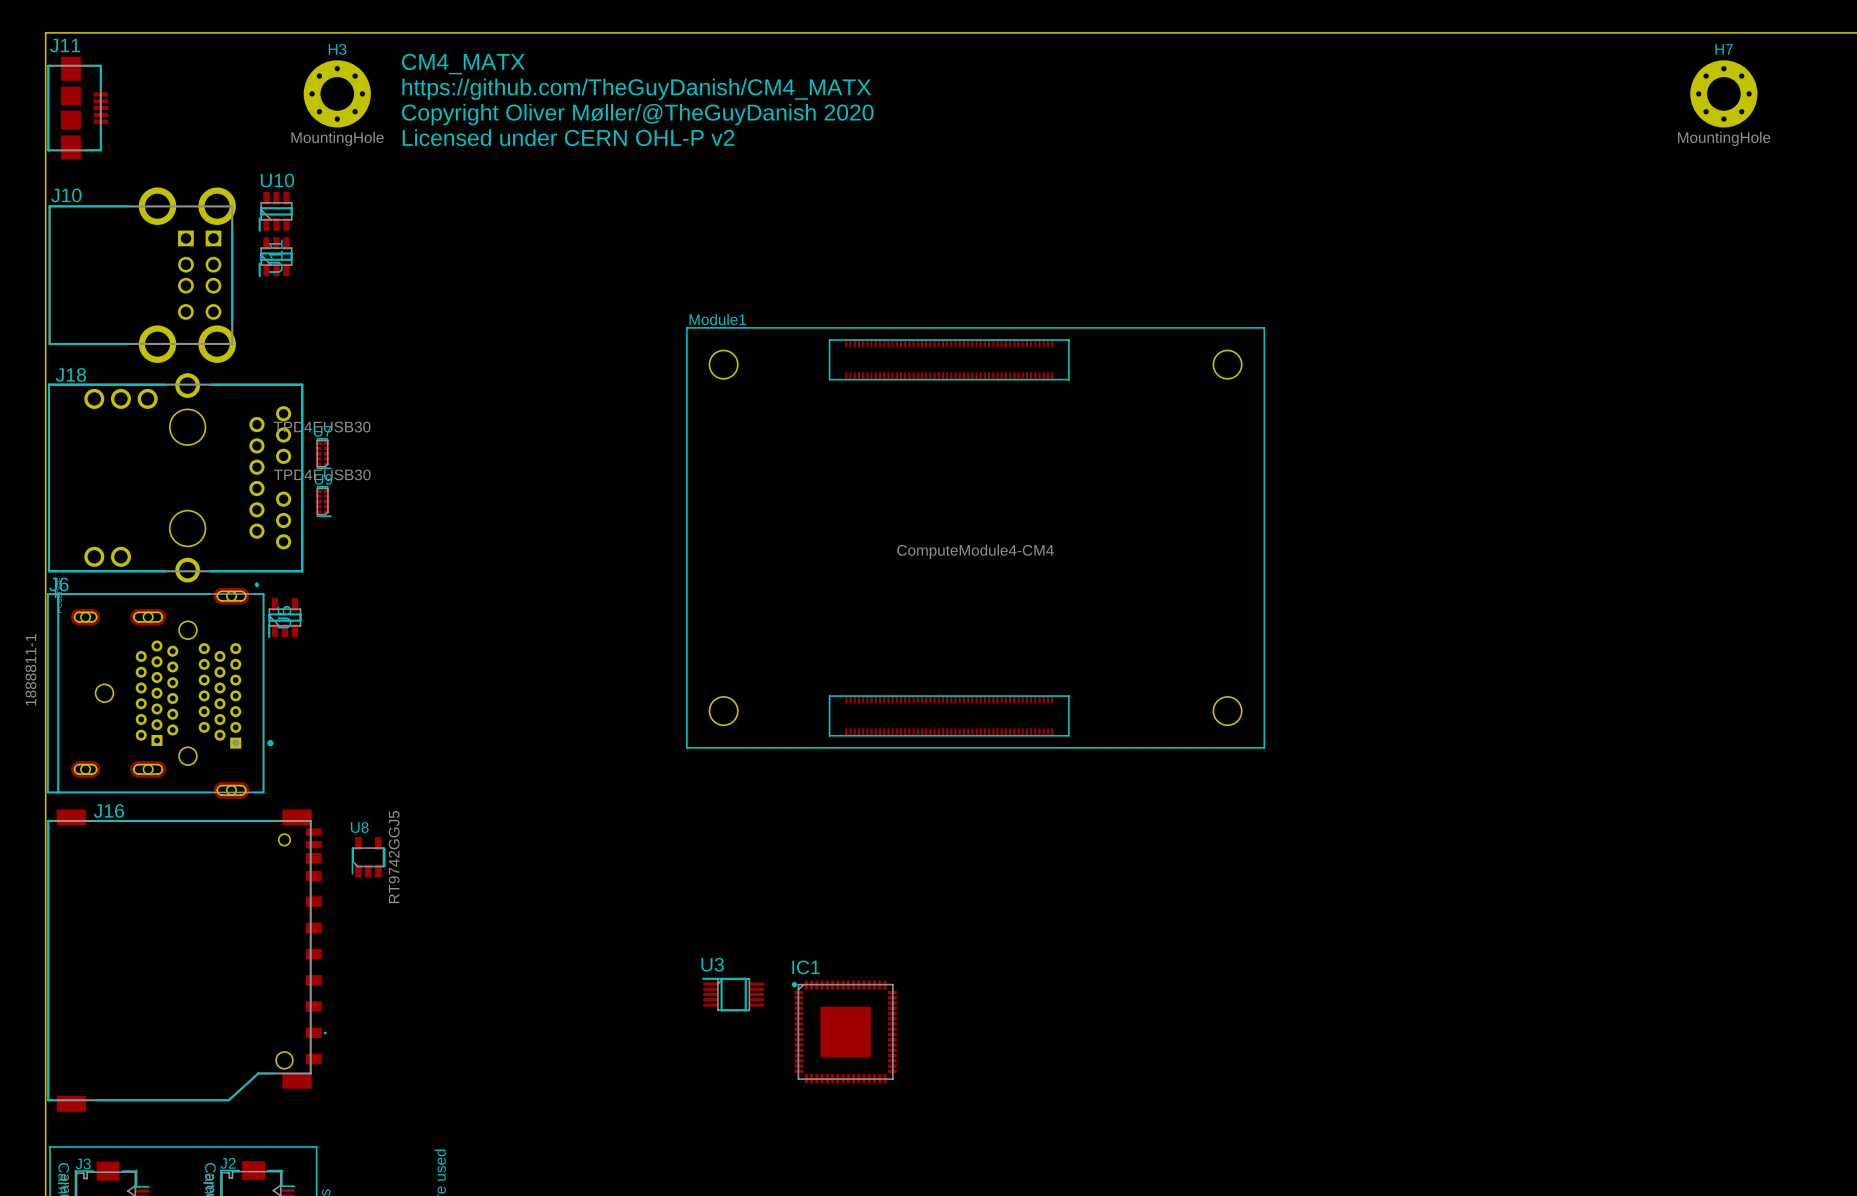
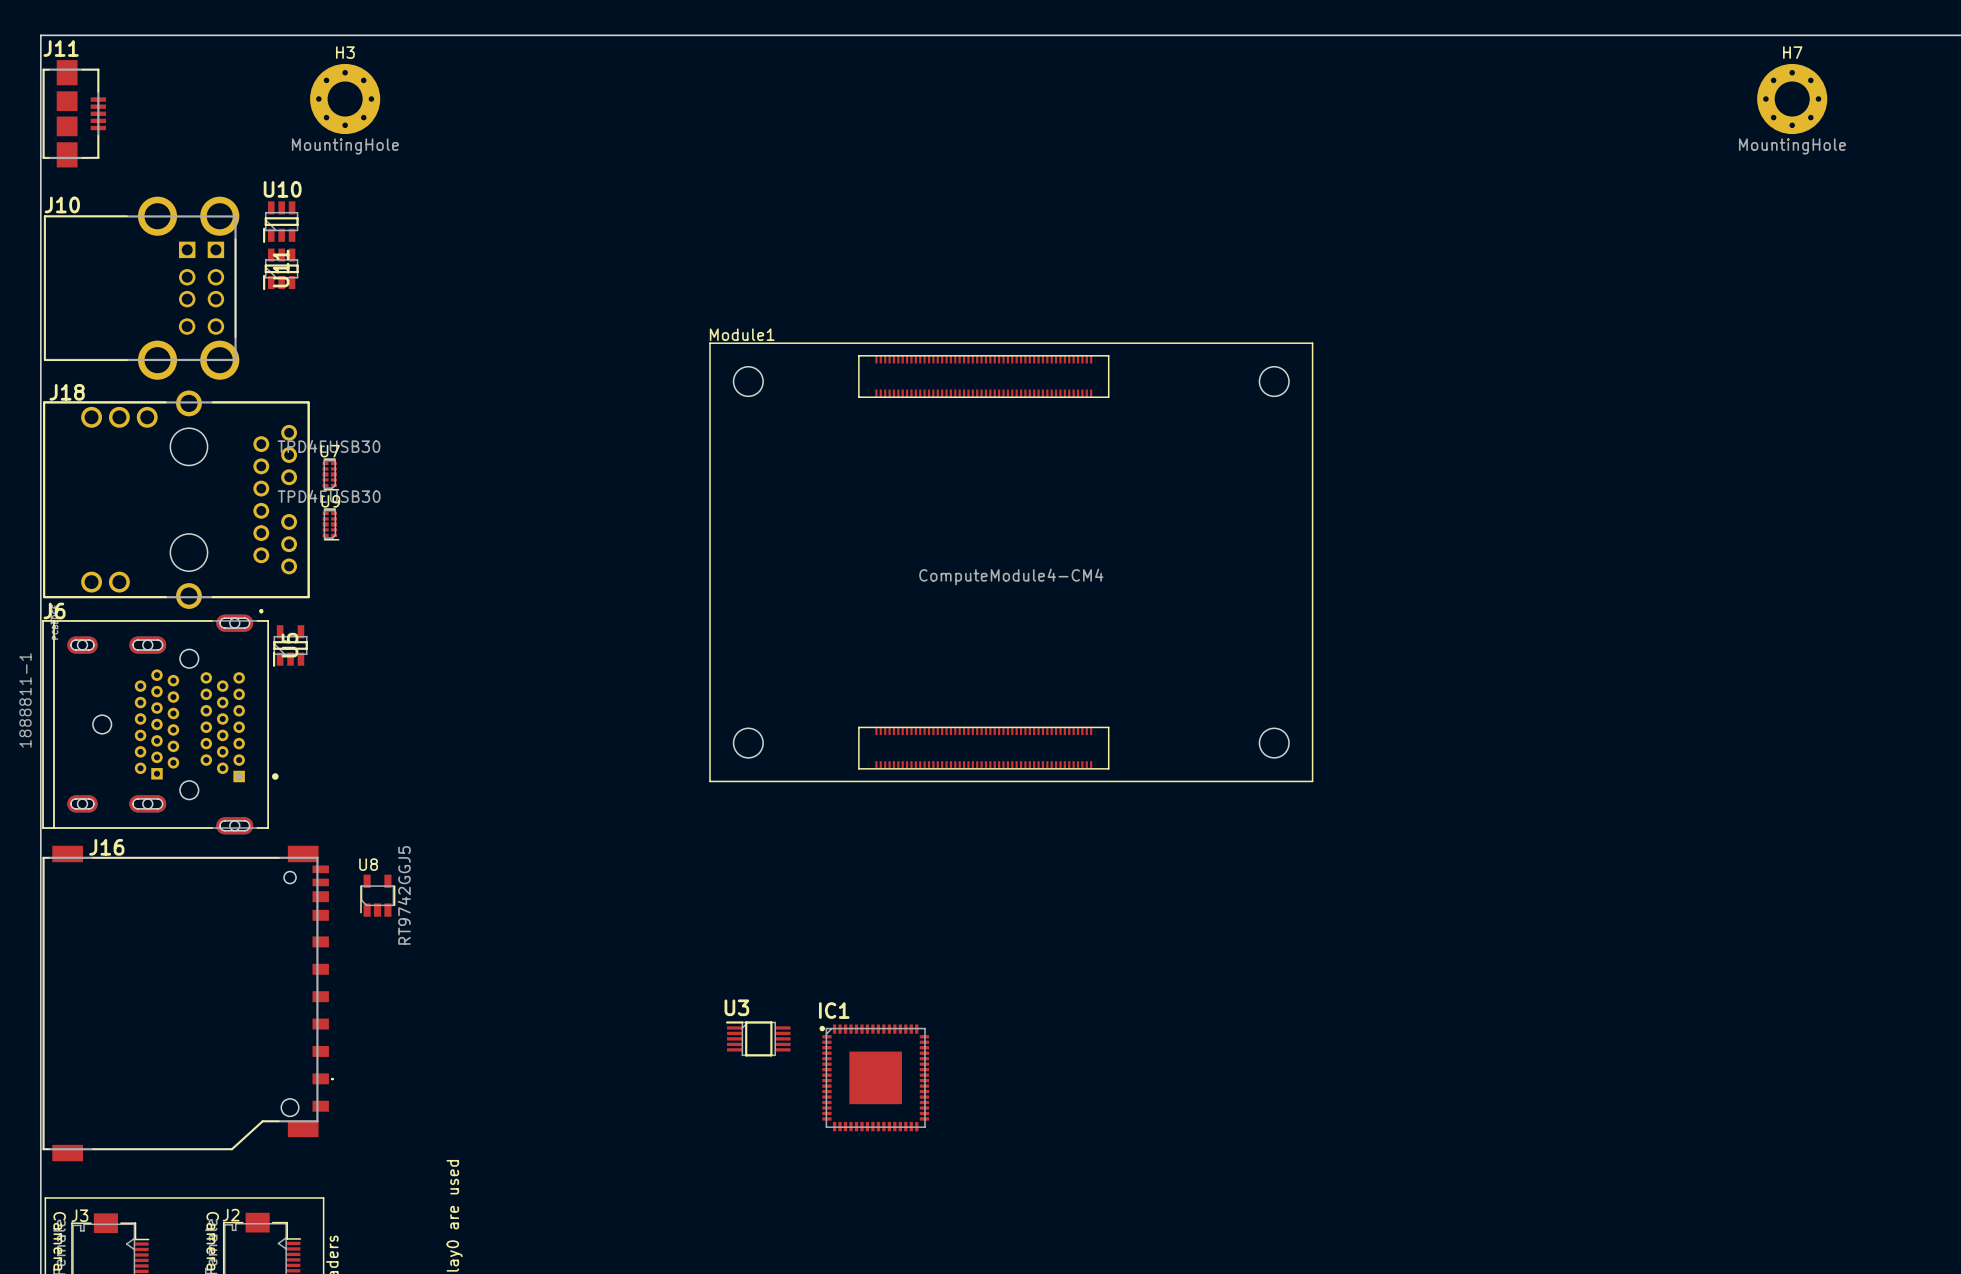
text: CM4_MATX (463, 64) -> none
text: https://github.com/TheGuyDanish/CM4_MATX (636, 89) -> none
text: Copyright Oliver Møller/@TheGuyDanish 2020 (637, 114) -> none
text: Licensed under CERN OHL-P v2 (568, 137) -> none

